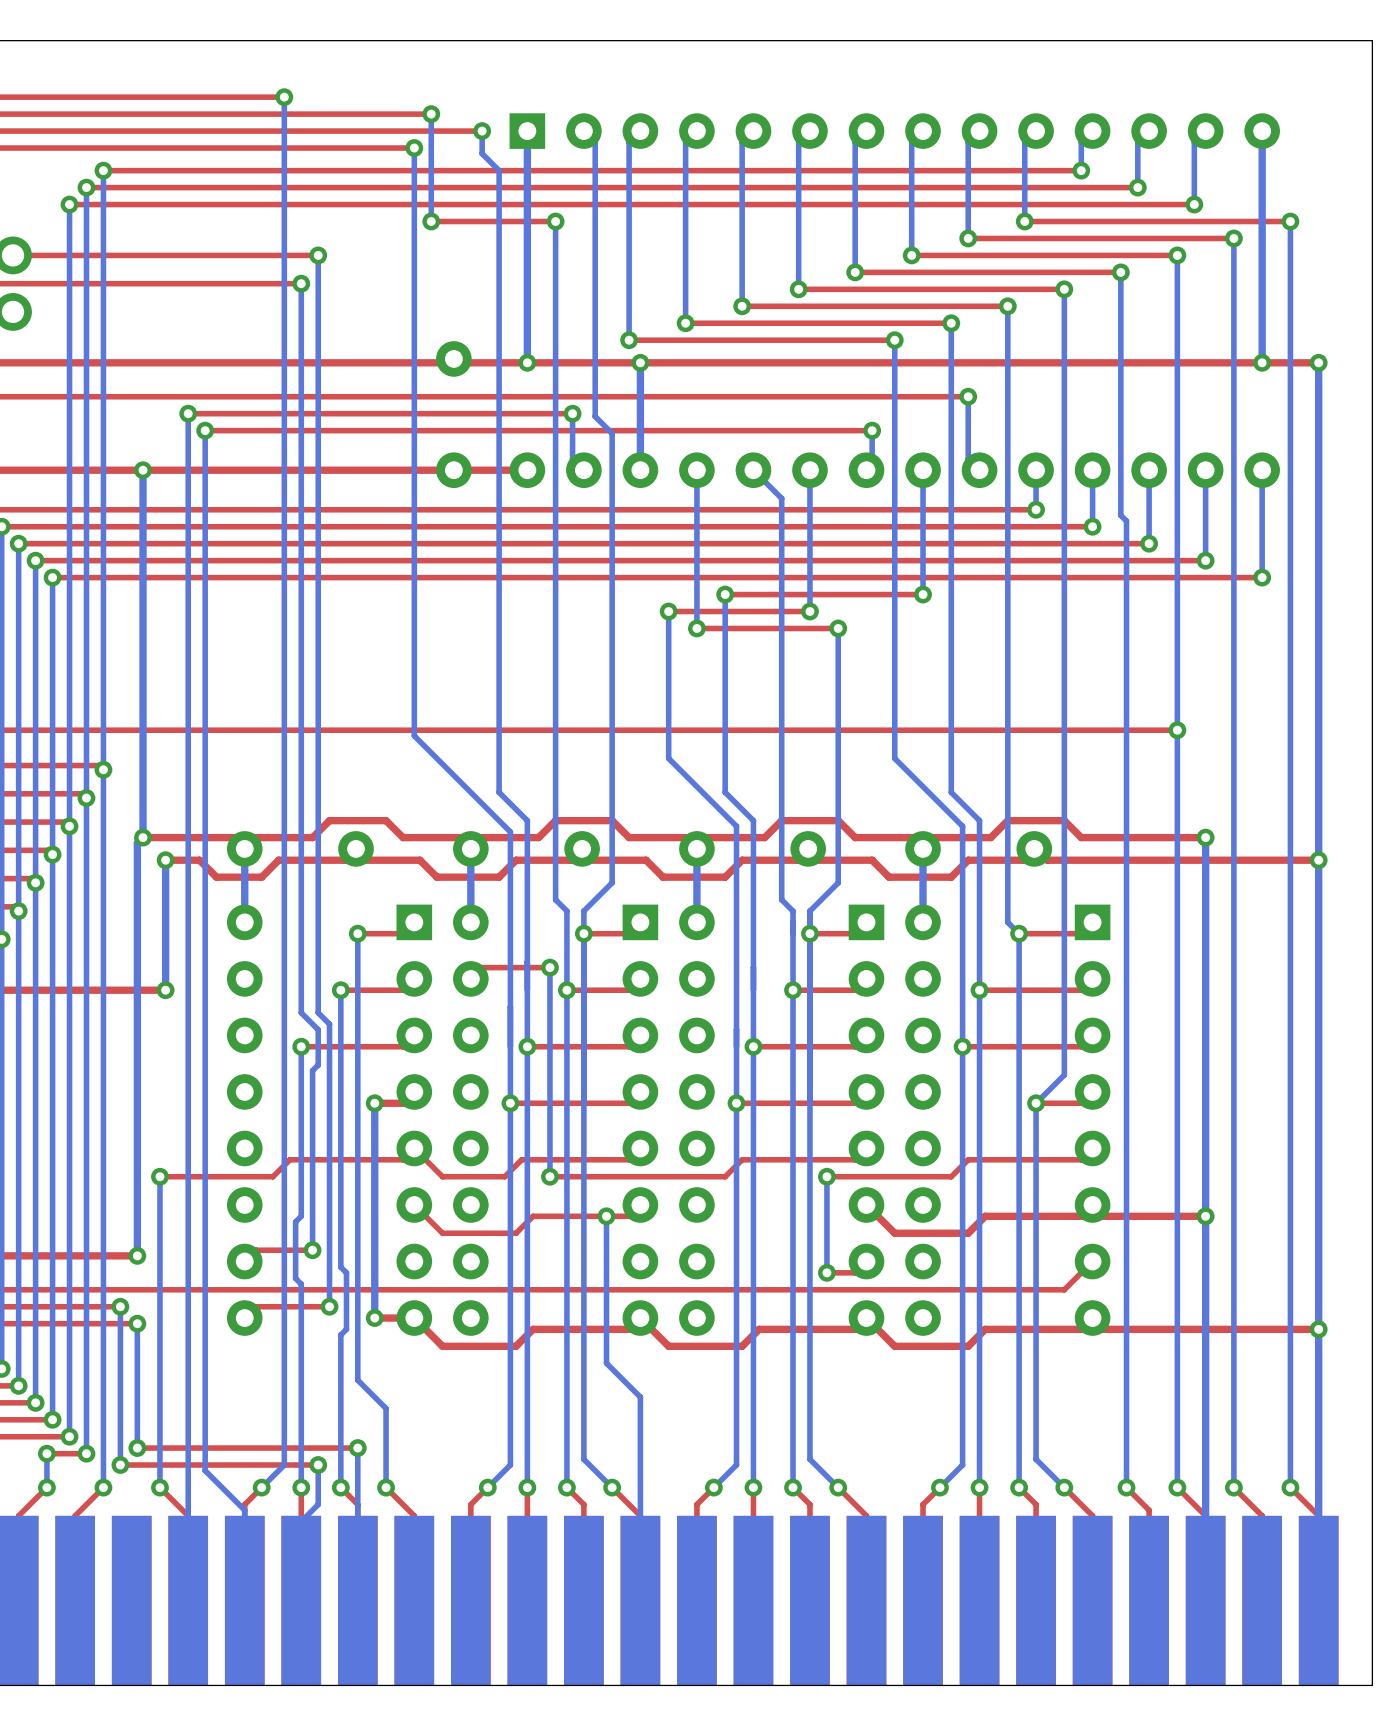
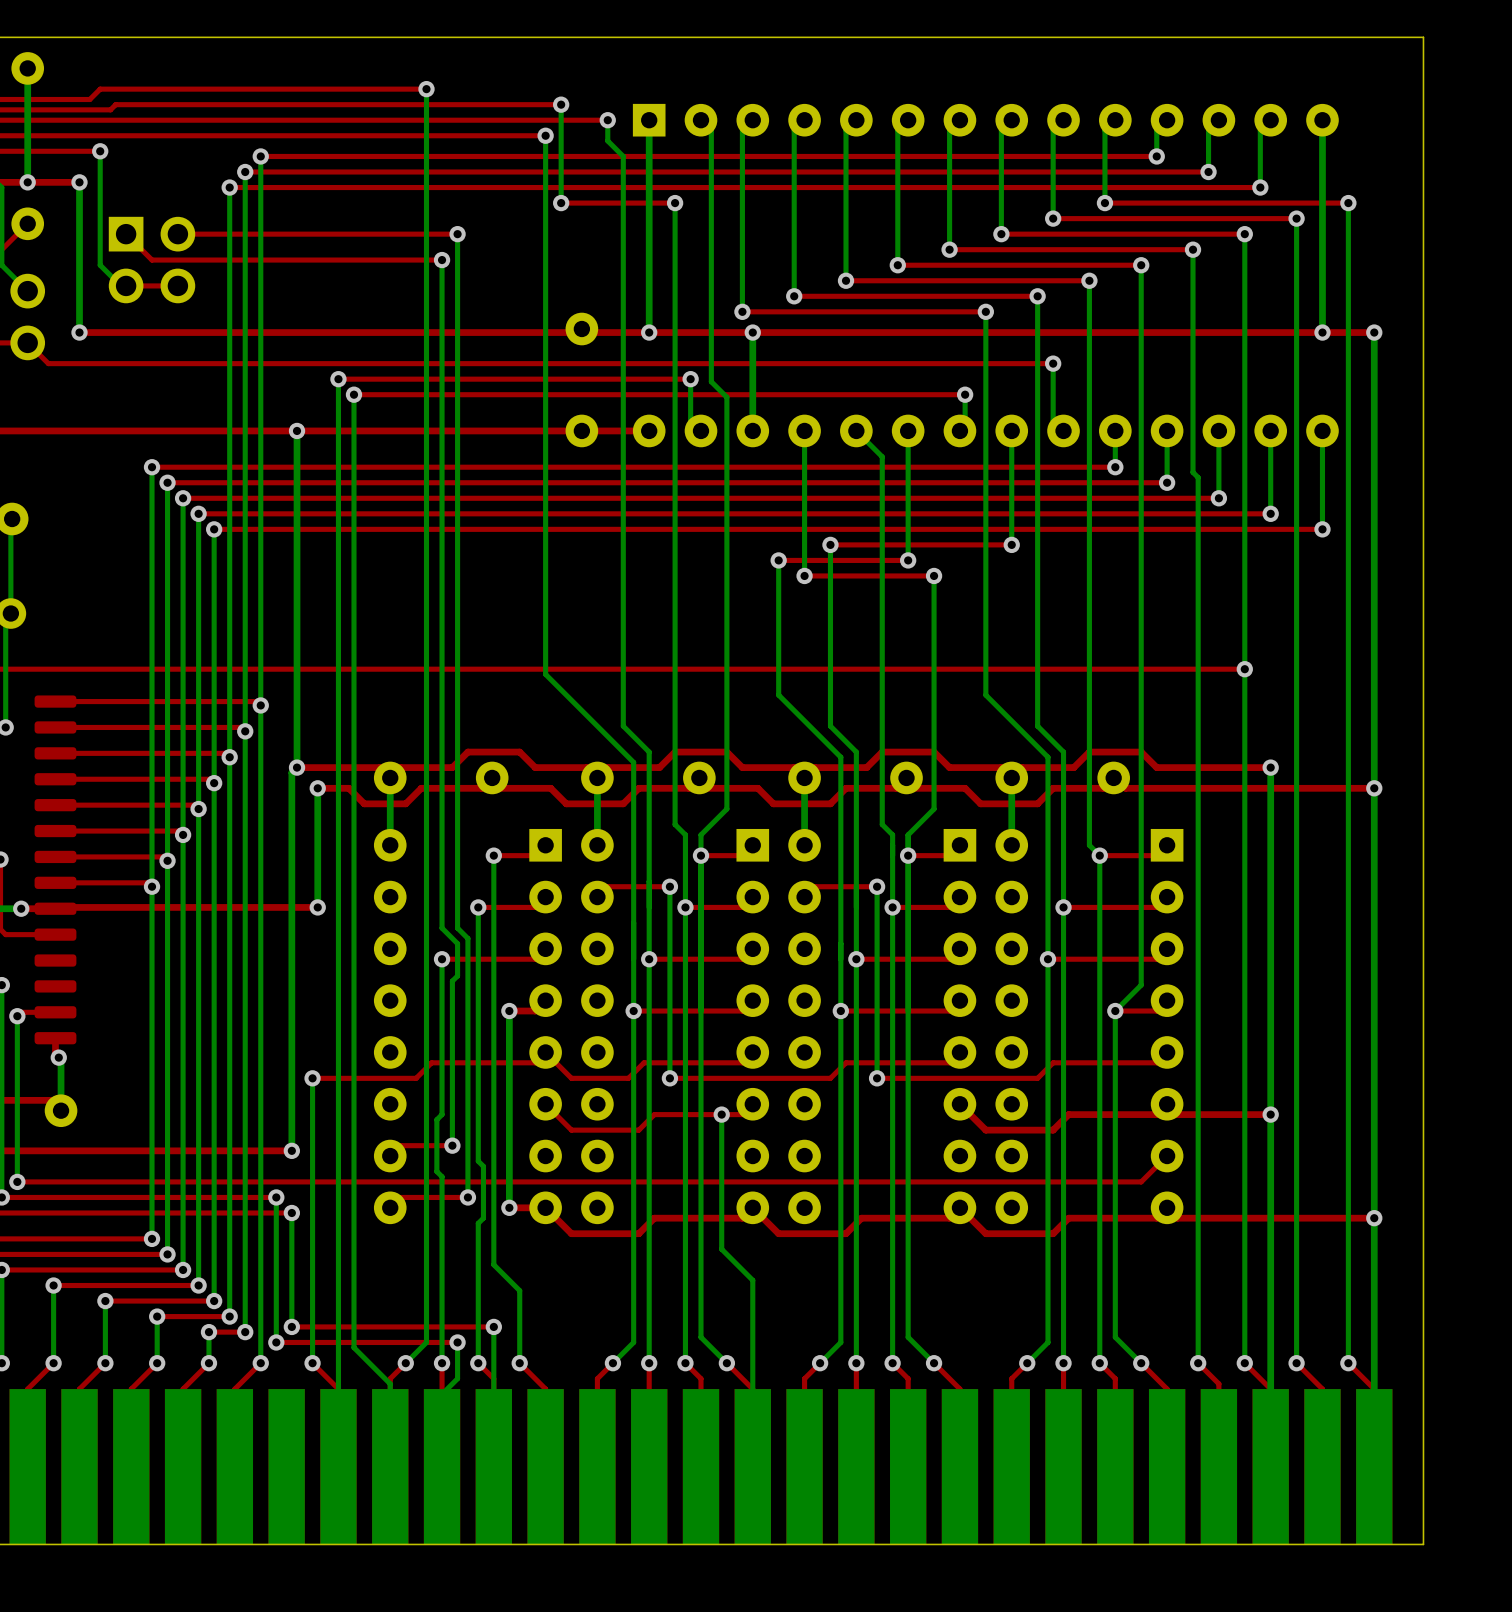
top track: none -> (877, 886) (814, 886) (804, 897)
bottom track: none -> (877, 886) (877, 1078)
via: none -> (877, 886)
top track: none -> (923, 1078) (877, 1078)
bottom track: (826, 1176) (826, 1272) -> none
via position: (826, 1176) -> (877, 1078)
top track: (866, 1261) (855, 1272) (826, 1272) -> none
via: (826, 1272) -> none

